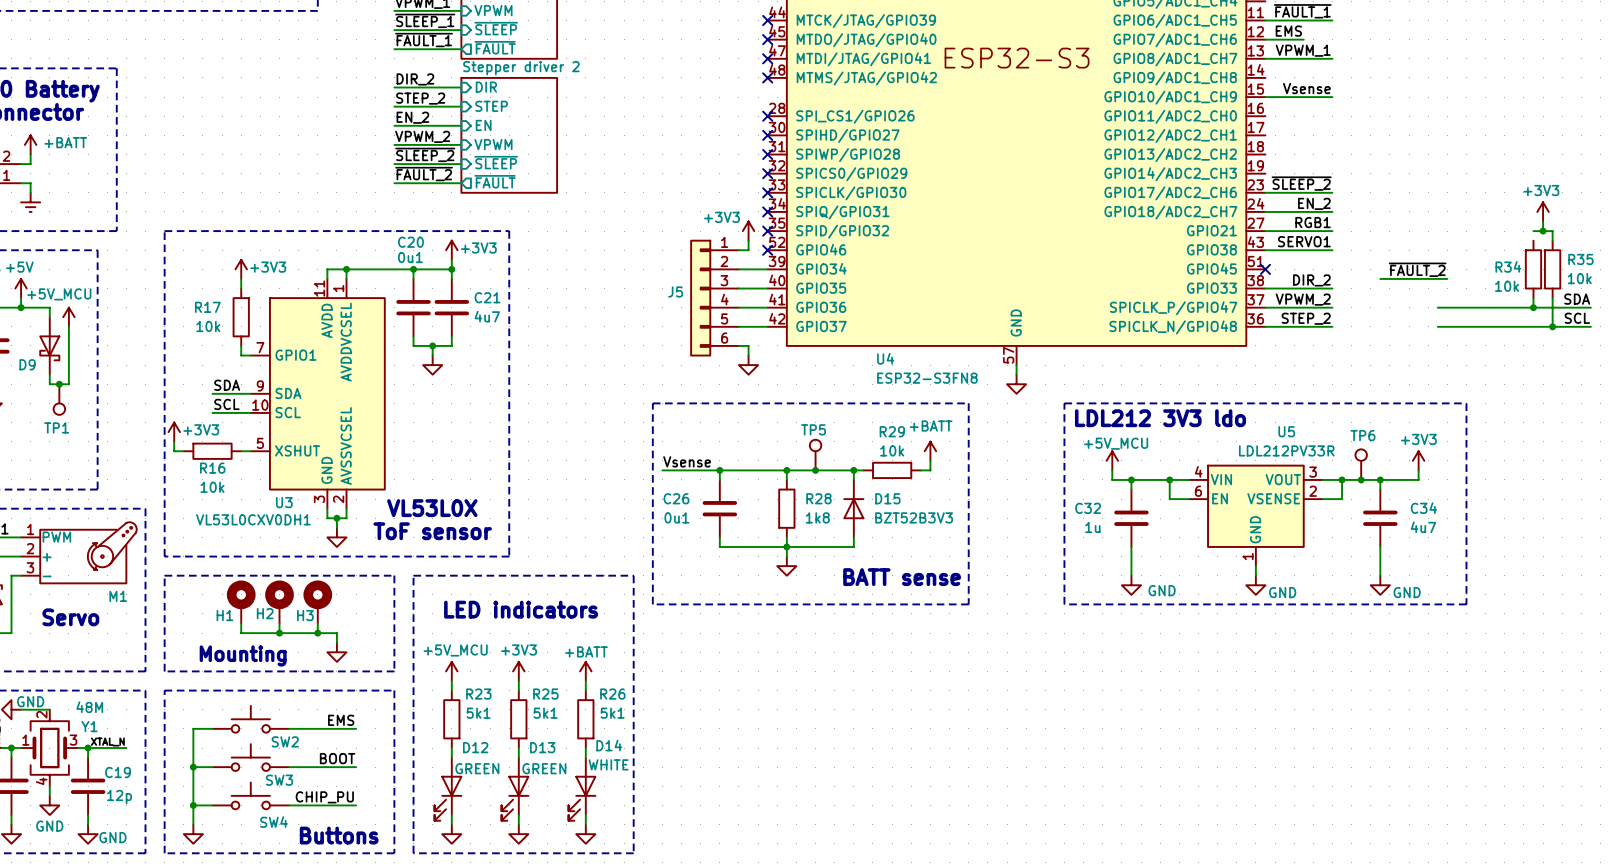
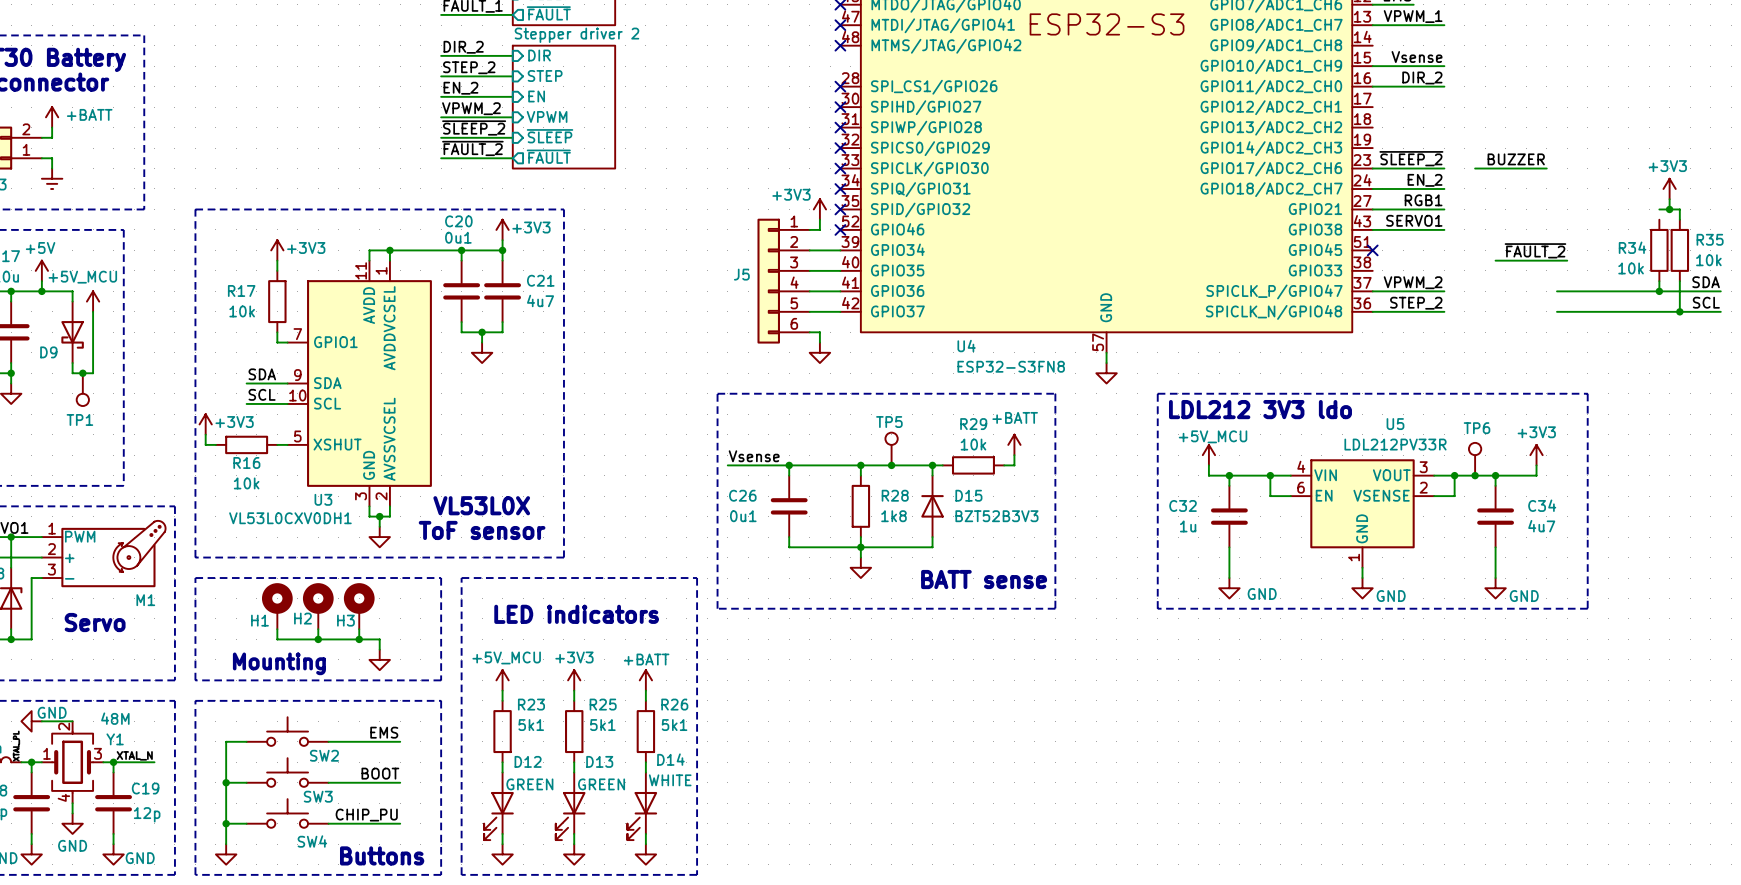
wire: none -> (1372, 86) (1444, 86)
label: none -> BUZZER (1516, 159)
label position: DIR_2 (1311, 280) -> DIR_2 (1422, 77)
wire: (1265, 288) (1332, 288) -> (1475, 168) (1546, 168)

